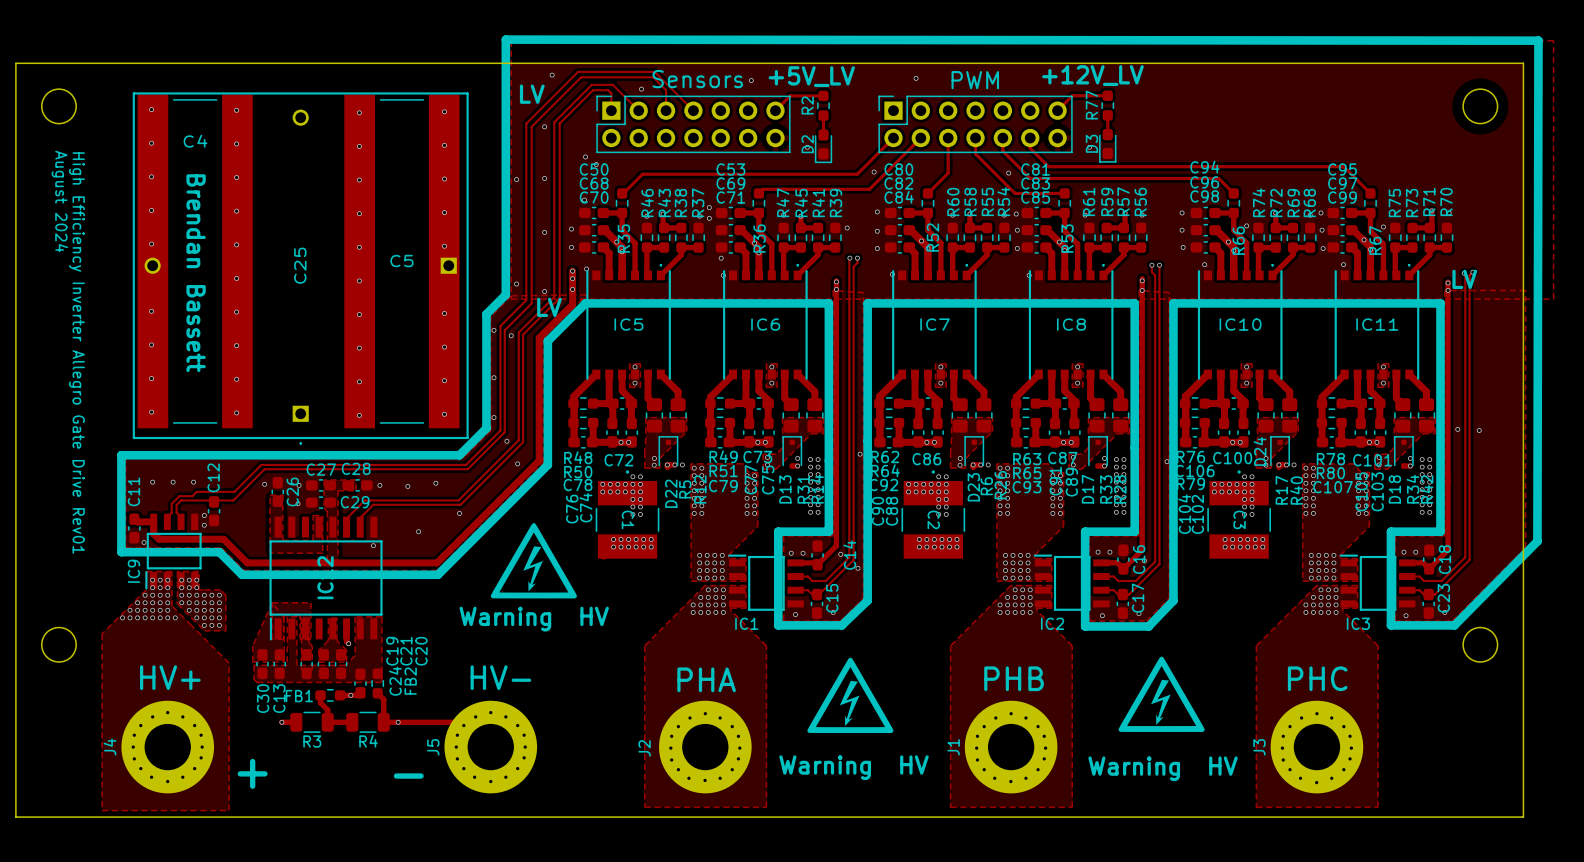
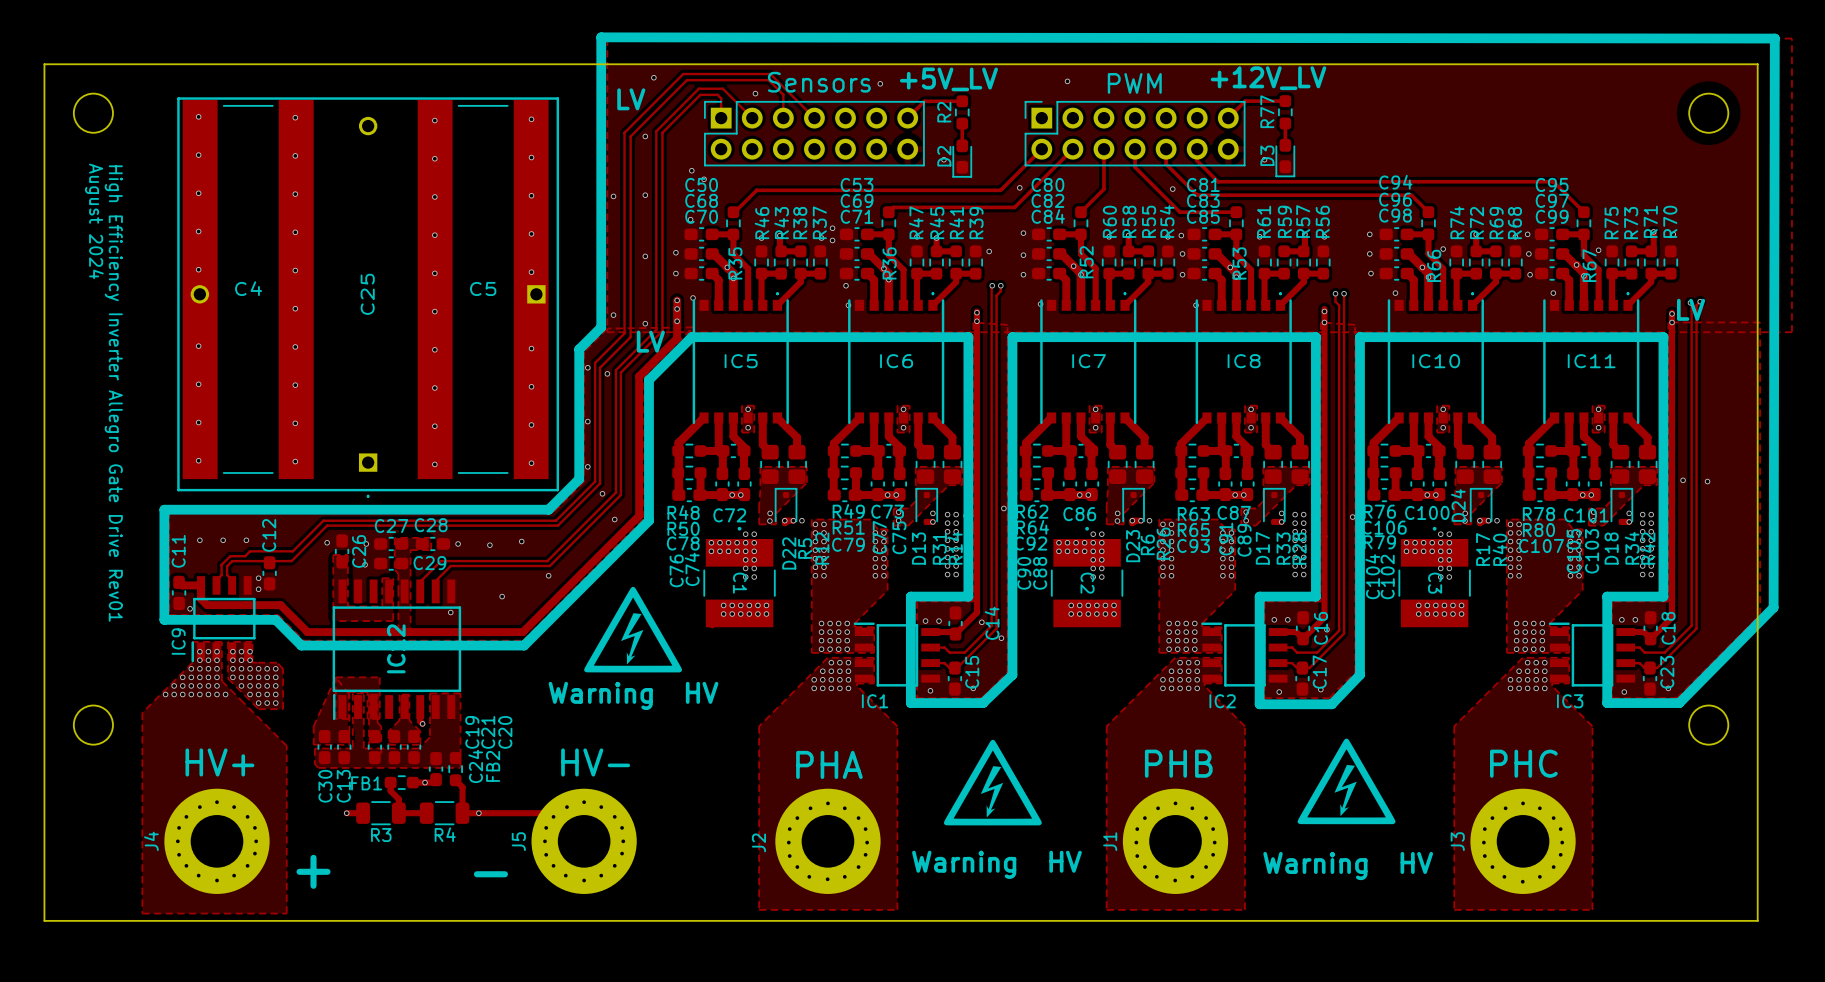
C4 name position: C4 (195, 141) -> C4 (248, 288)
text: Brendan Bassett (196, 273) -> none

